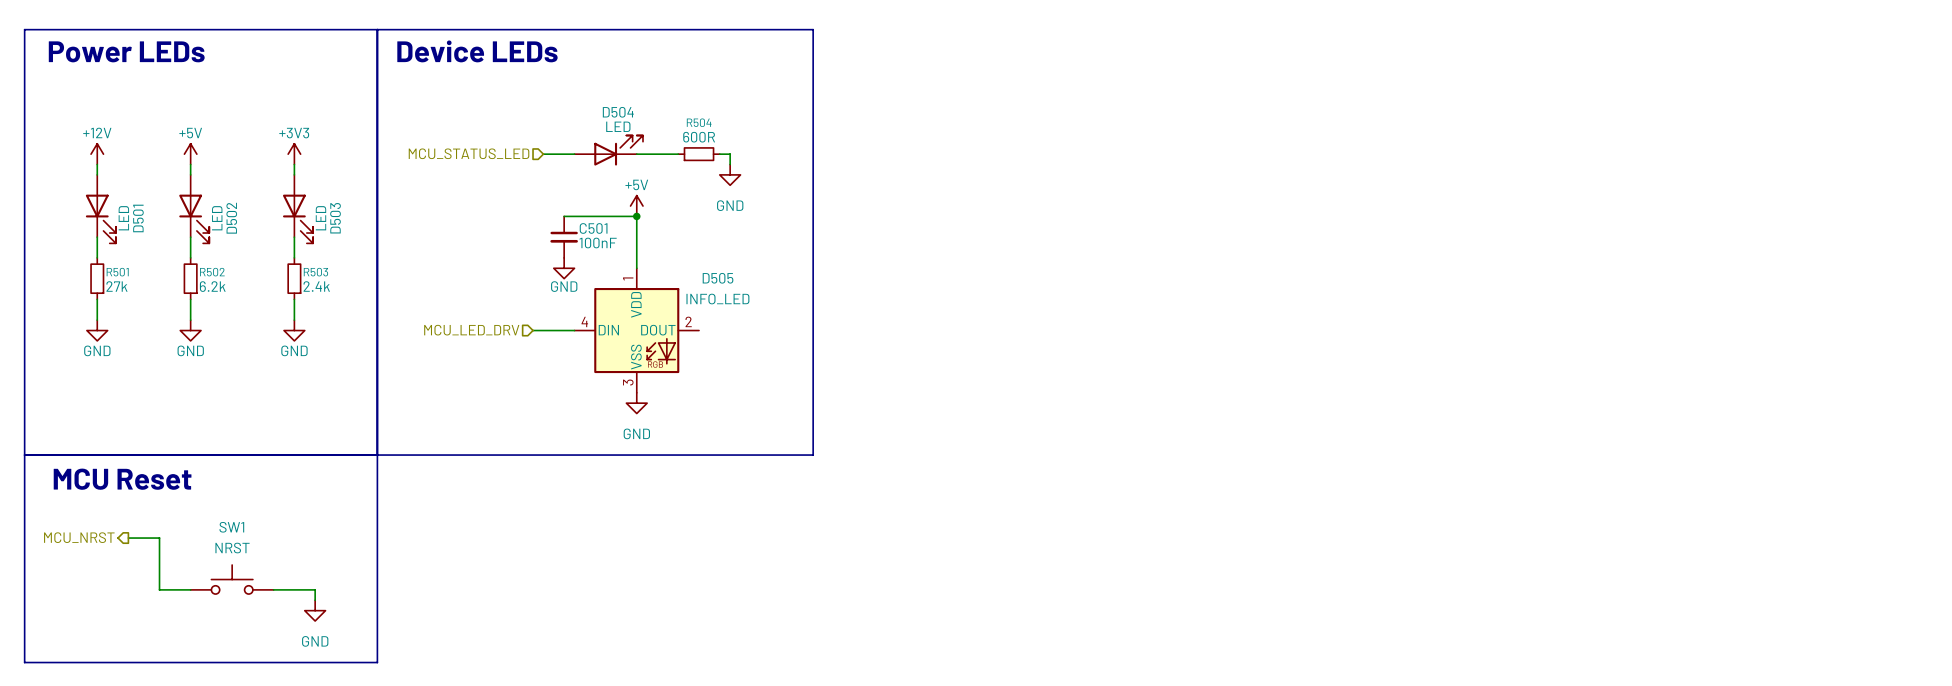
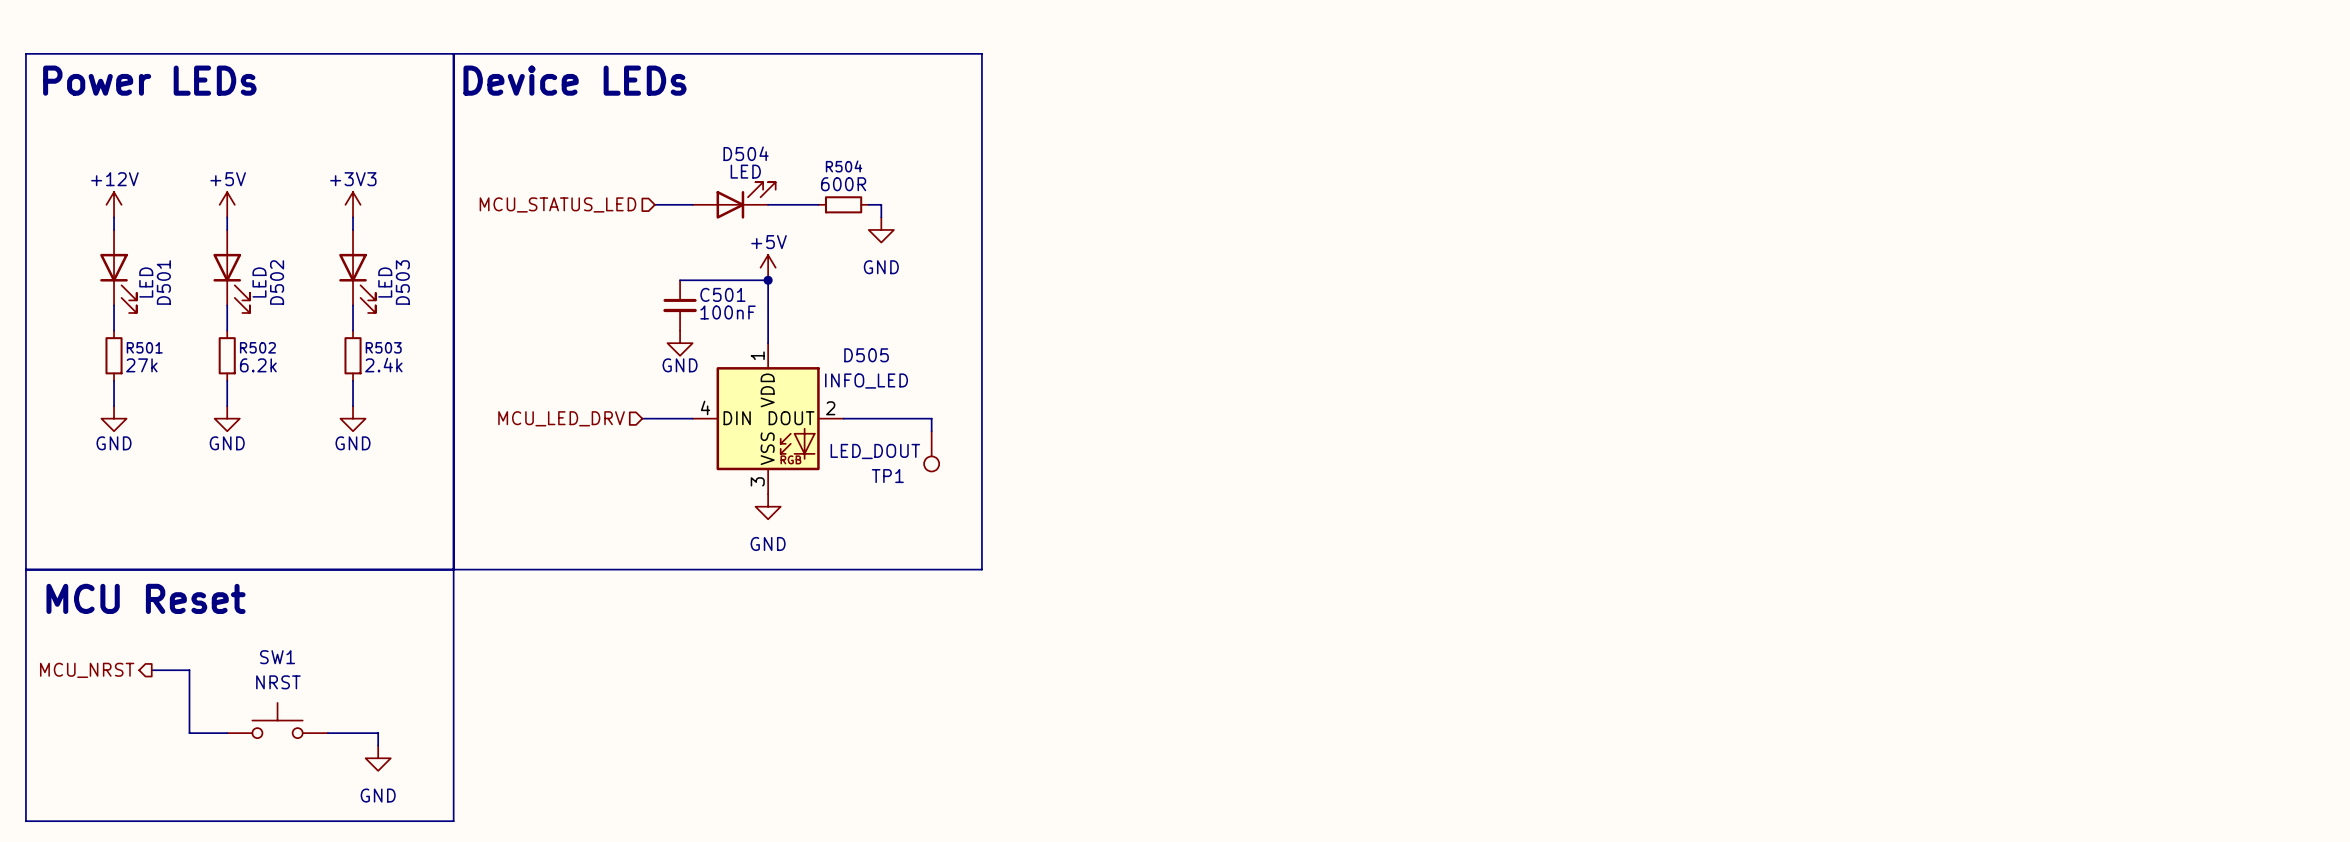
wire: none -> (843, 418) (931, 418) (931, 431)
TP1: none -> LED_DOUT (931, 451)

